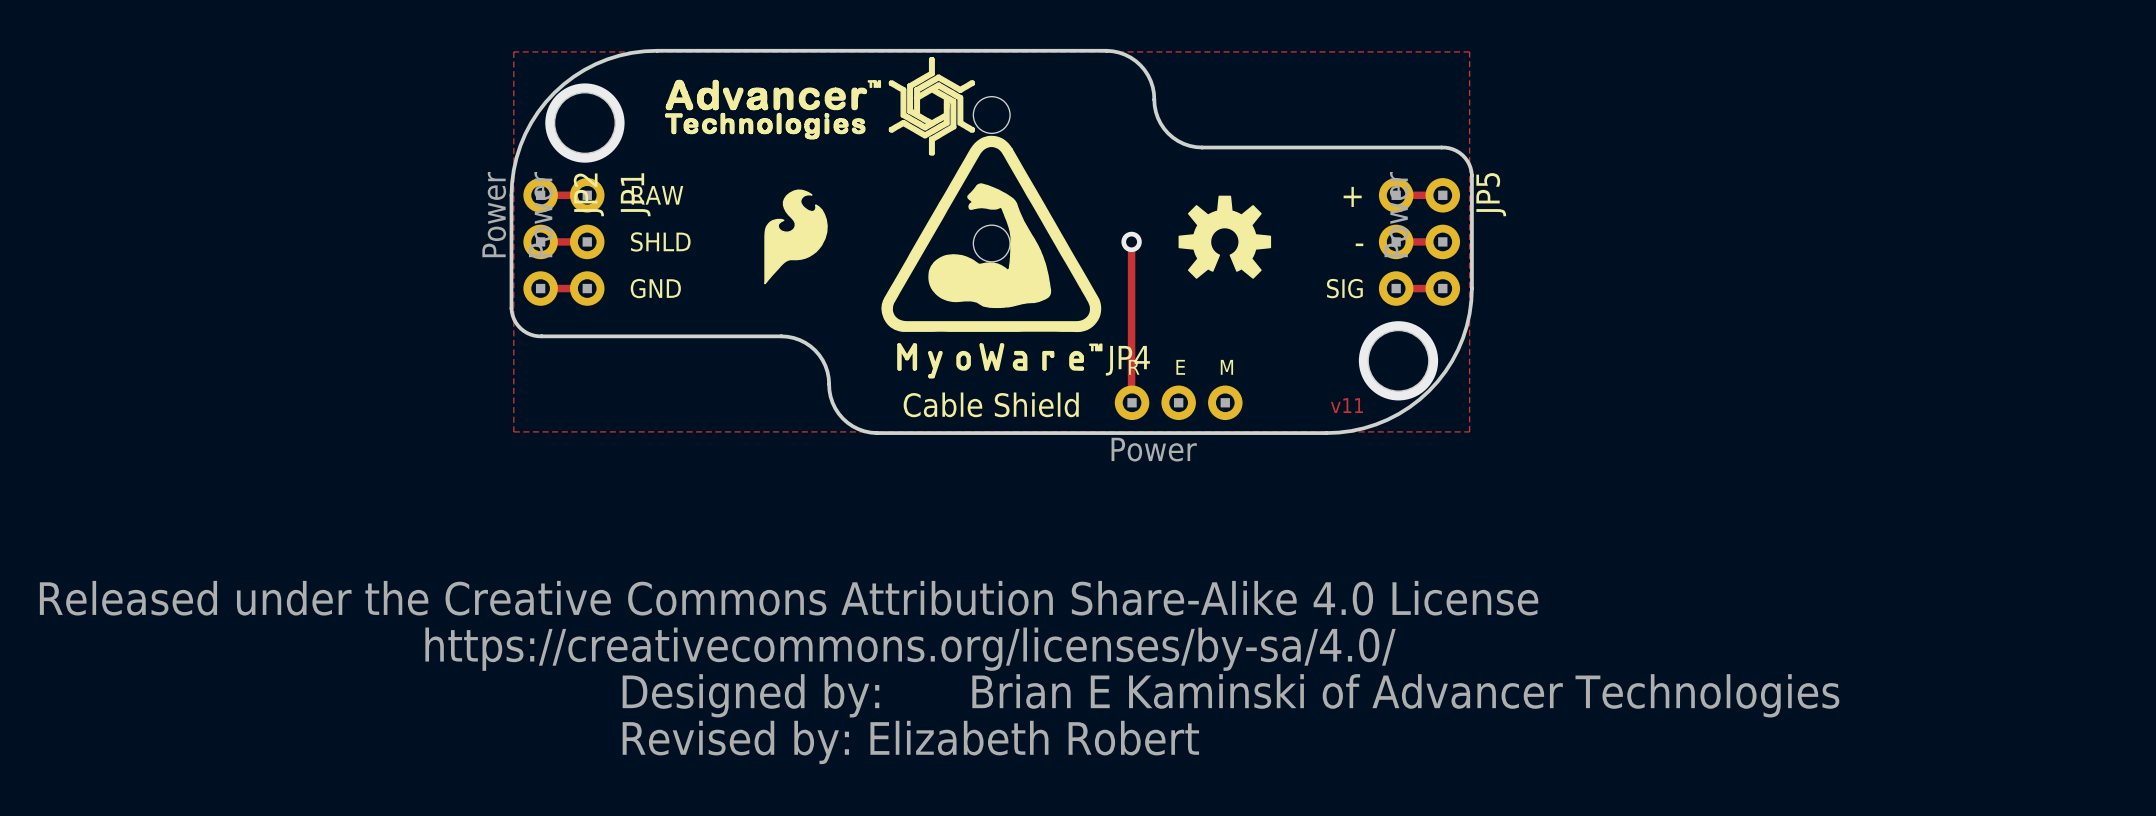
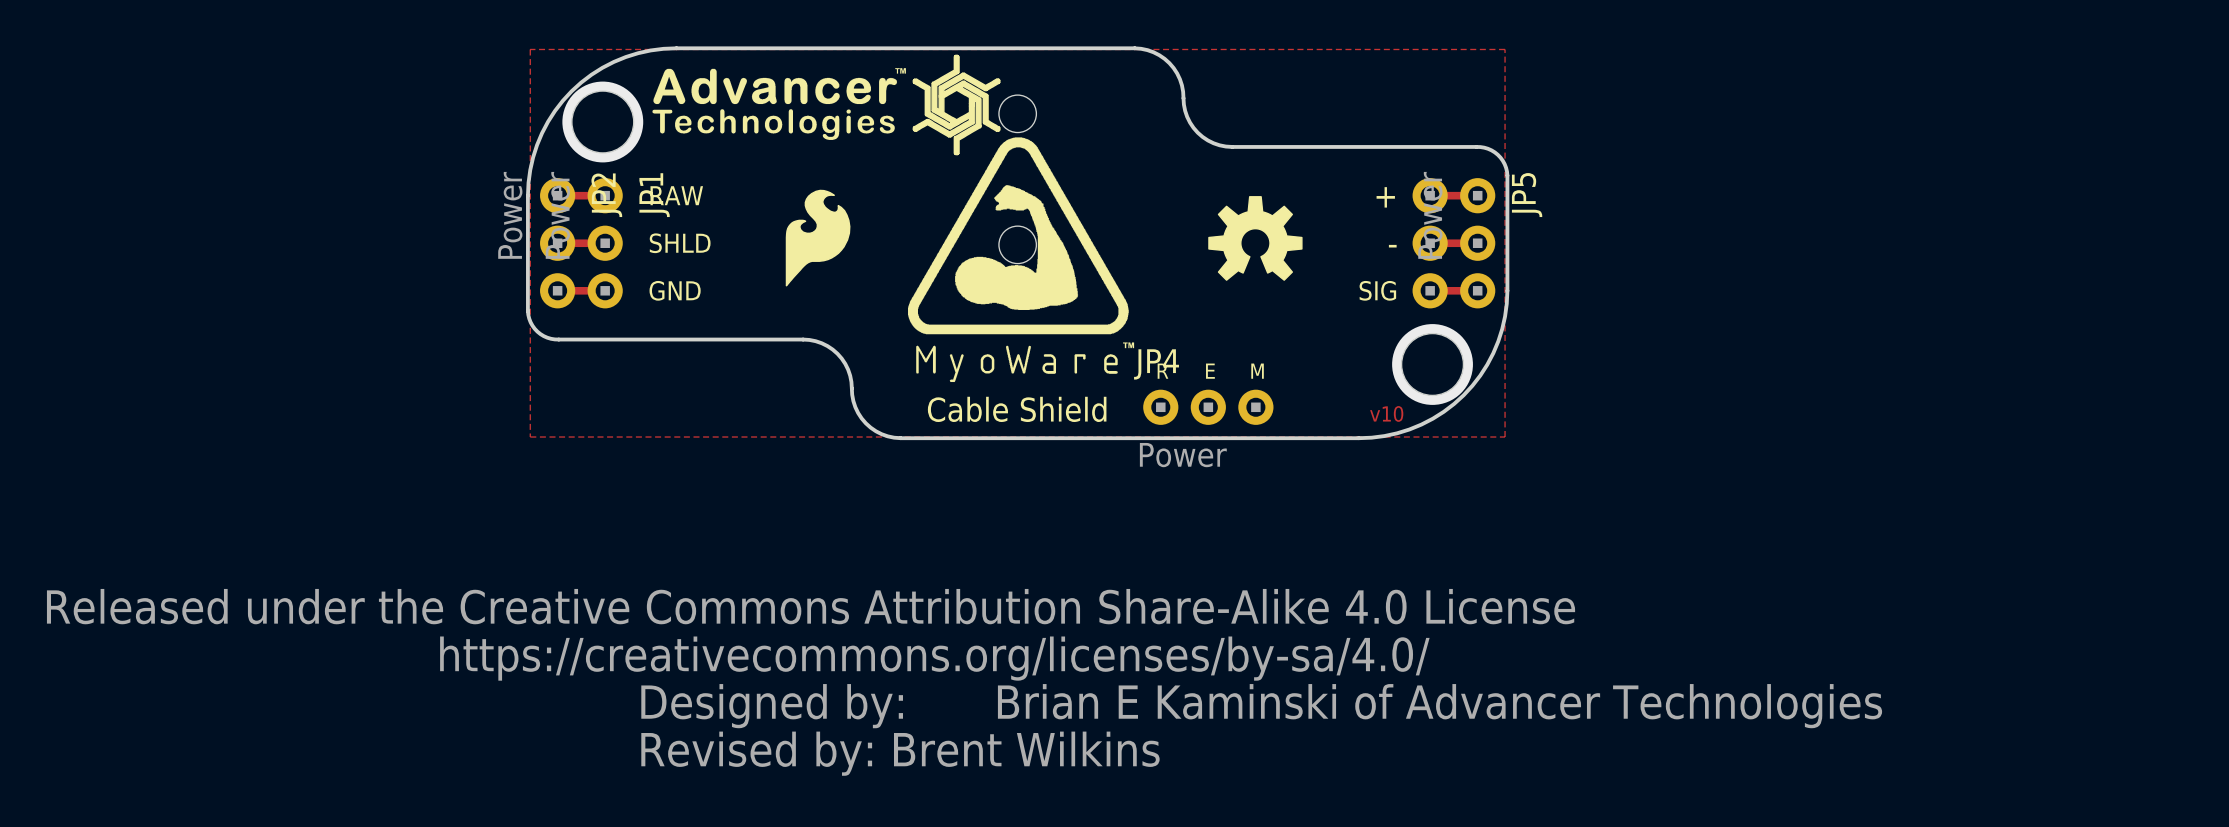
drawing: none -> [652, 68, 1135, 383]
drawing: [664, 79, 1103, 379] -> none
track: (1131, 241) (1132, 402) -> none
via: (1131, 241) -> none
text: v11 (1346, 405) -> v10 (1386, 413)
text: Revised by: Elizabeth Robert (910, 742) -> Revised by: Brent Wilkins (900, 753)

